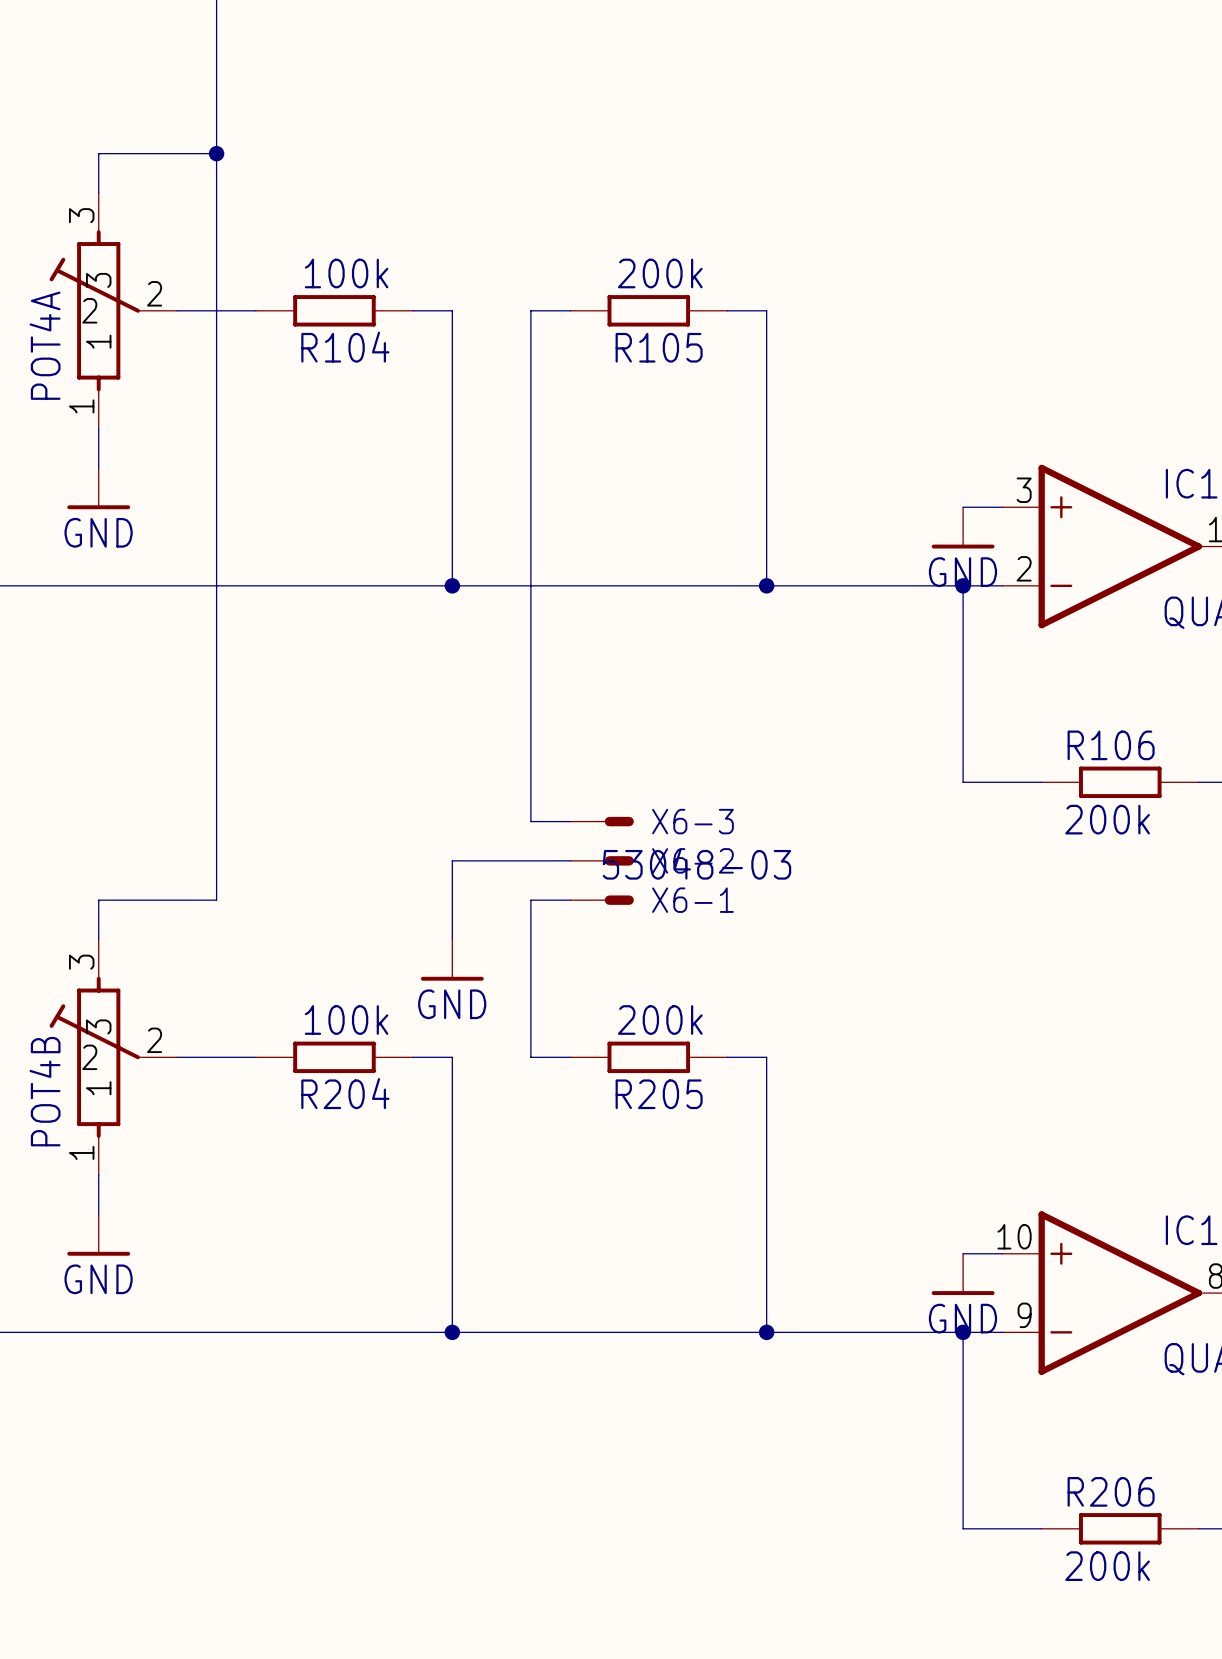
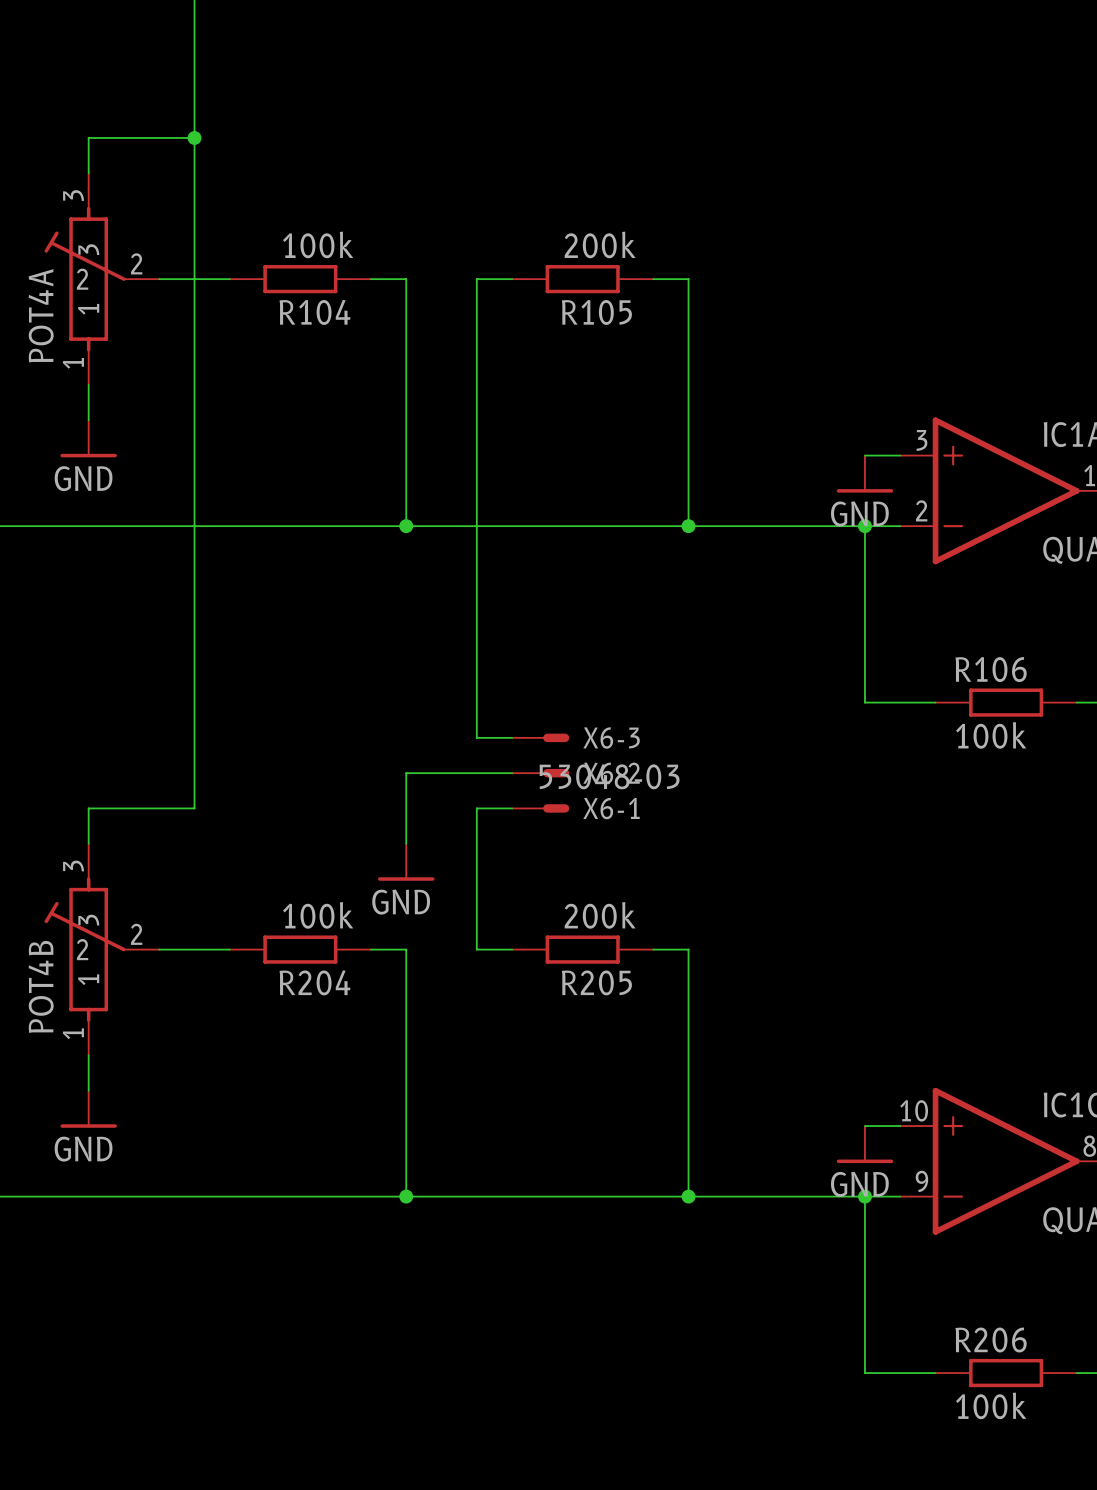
R106 value: 200k (1107, 819) -> 100k (991, 735)
R206 value: 200k (1107, 1566) -> 100k (991, 1405)

